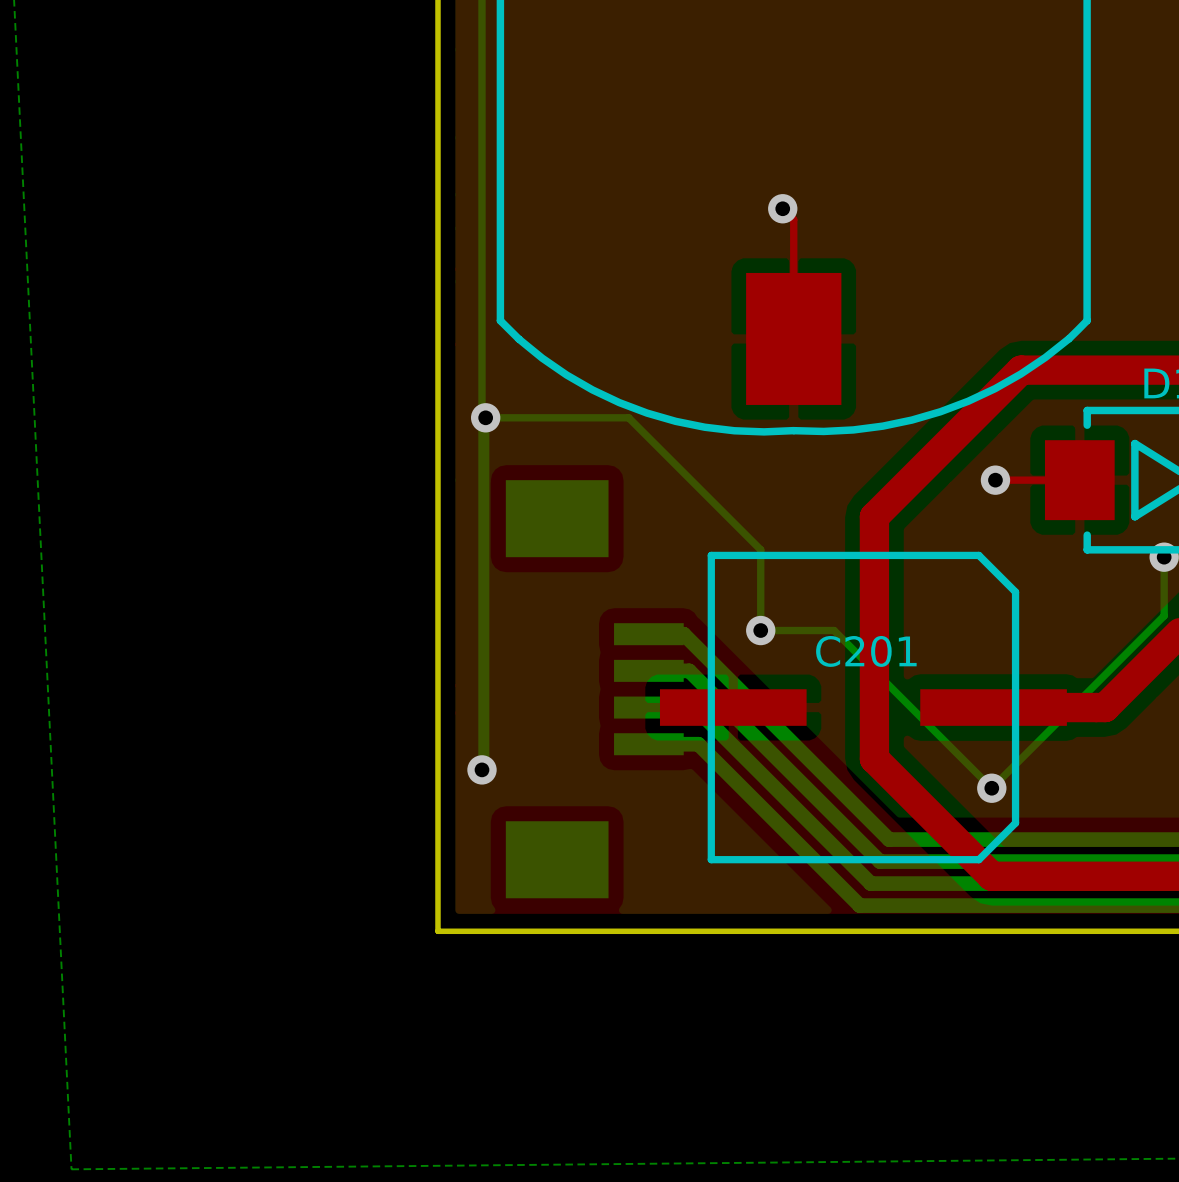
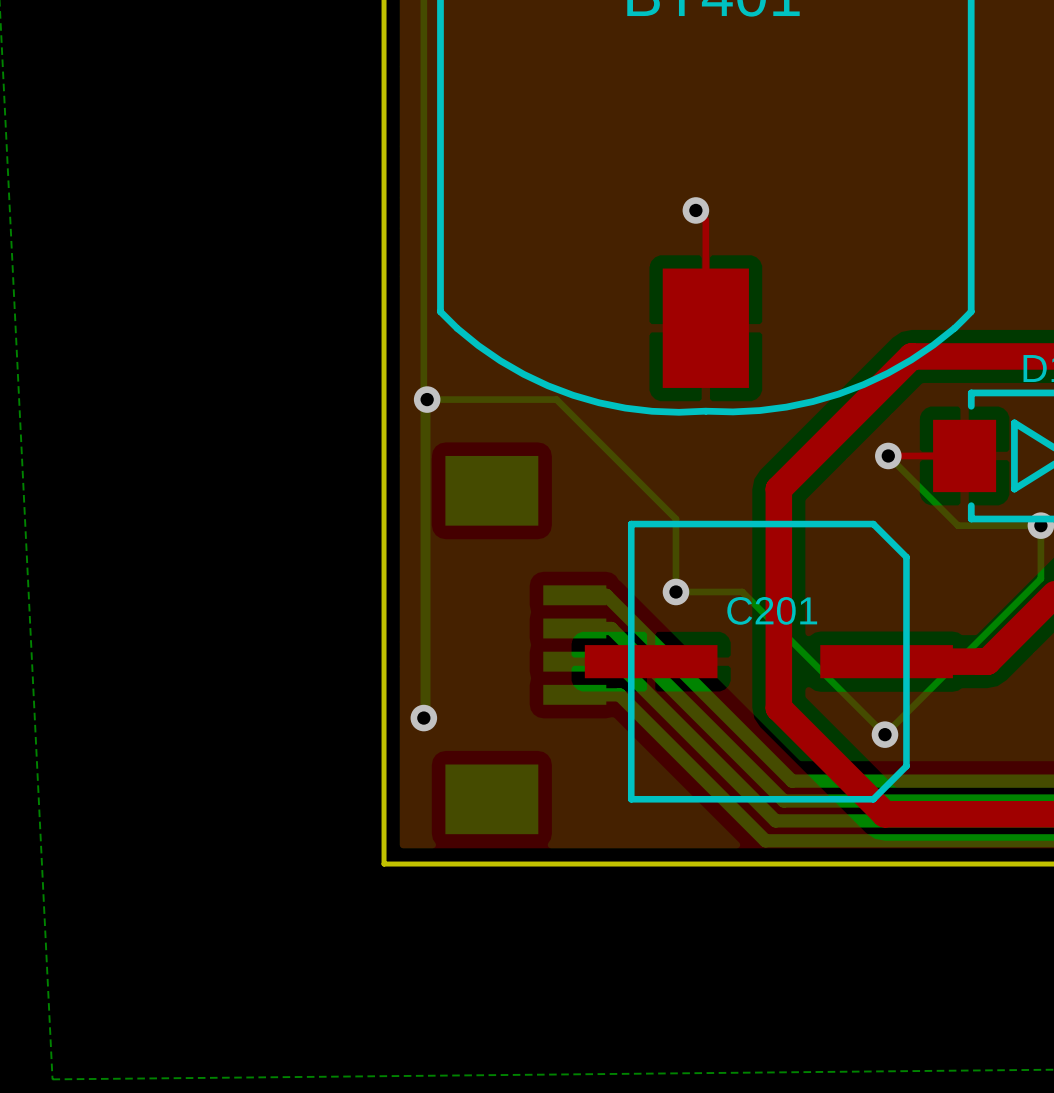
bottom track: none -> (888, 455) (957, 525) (1040, 525)

